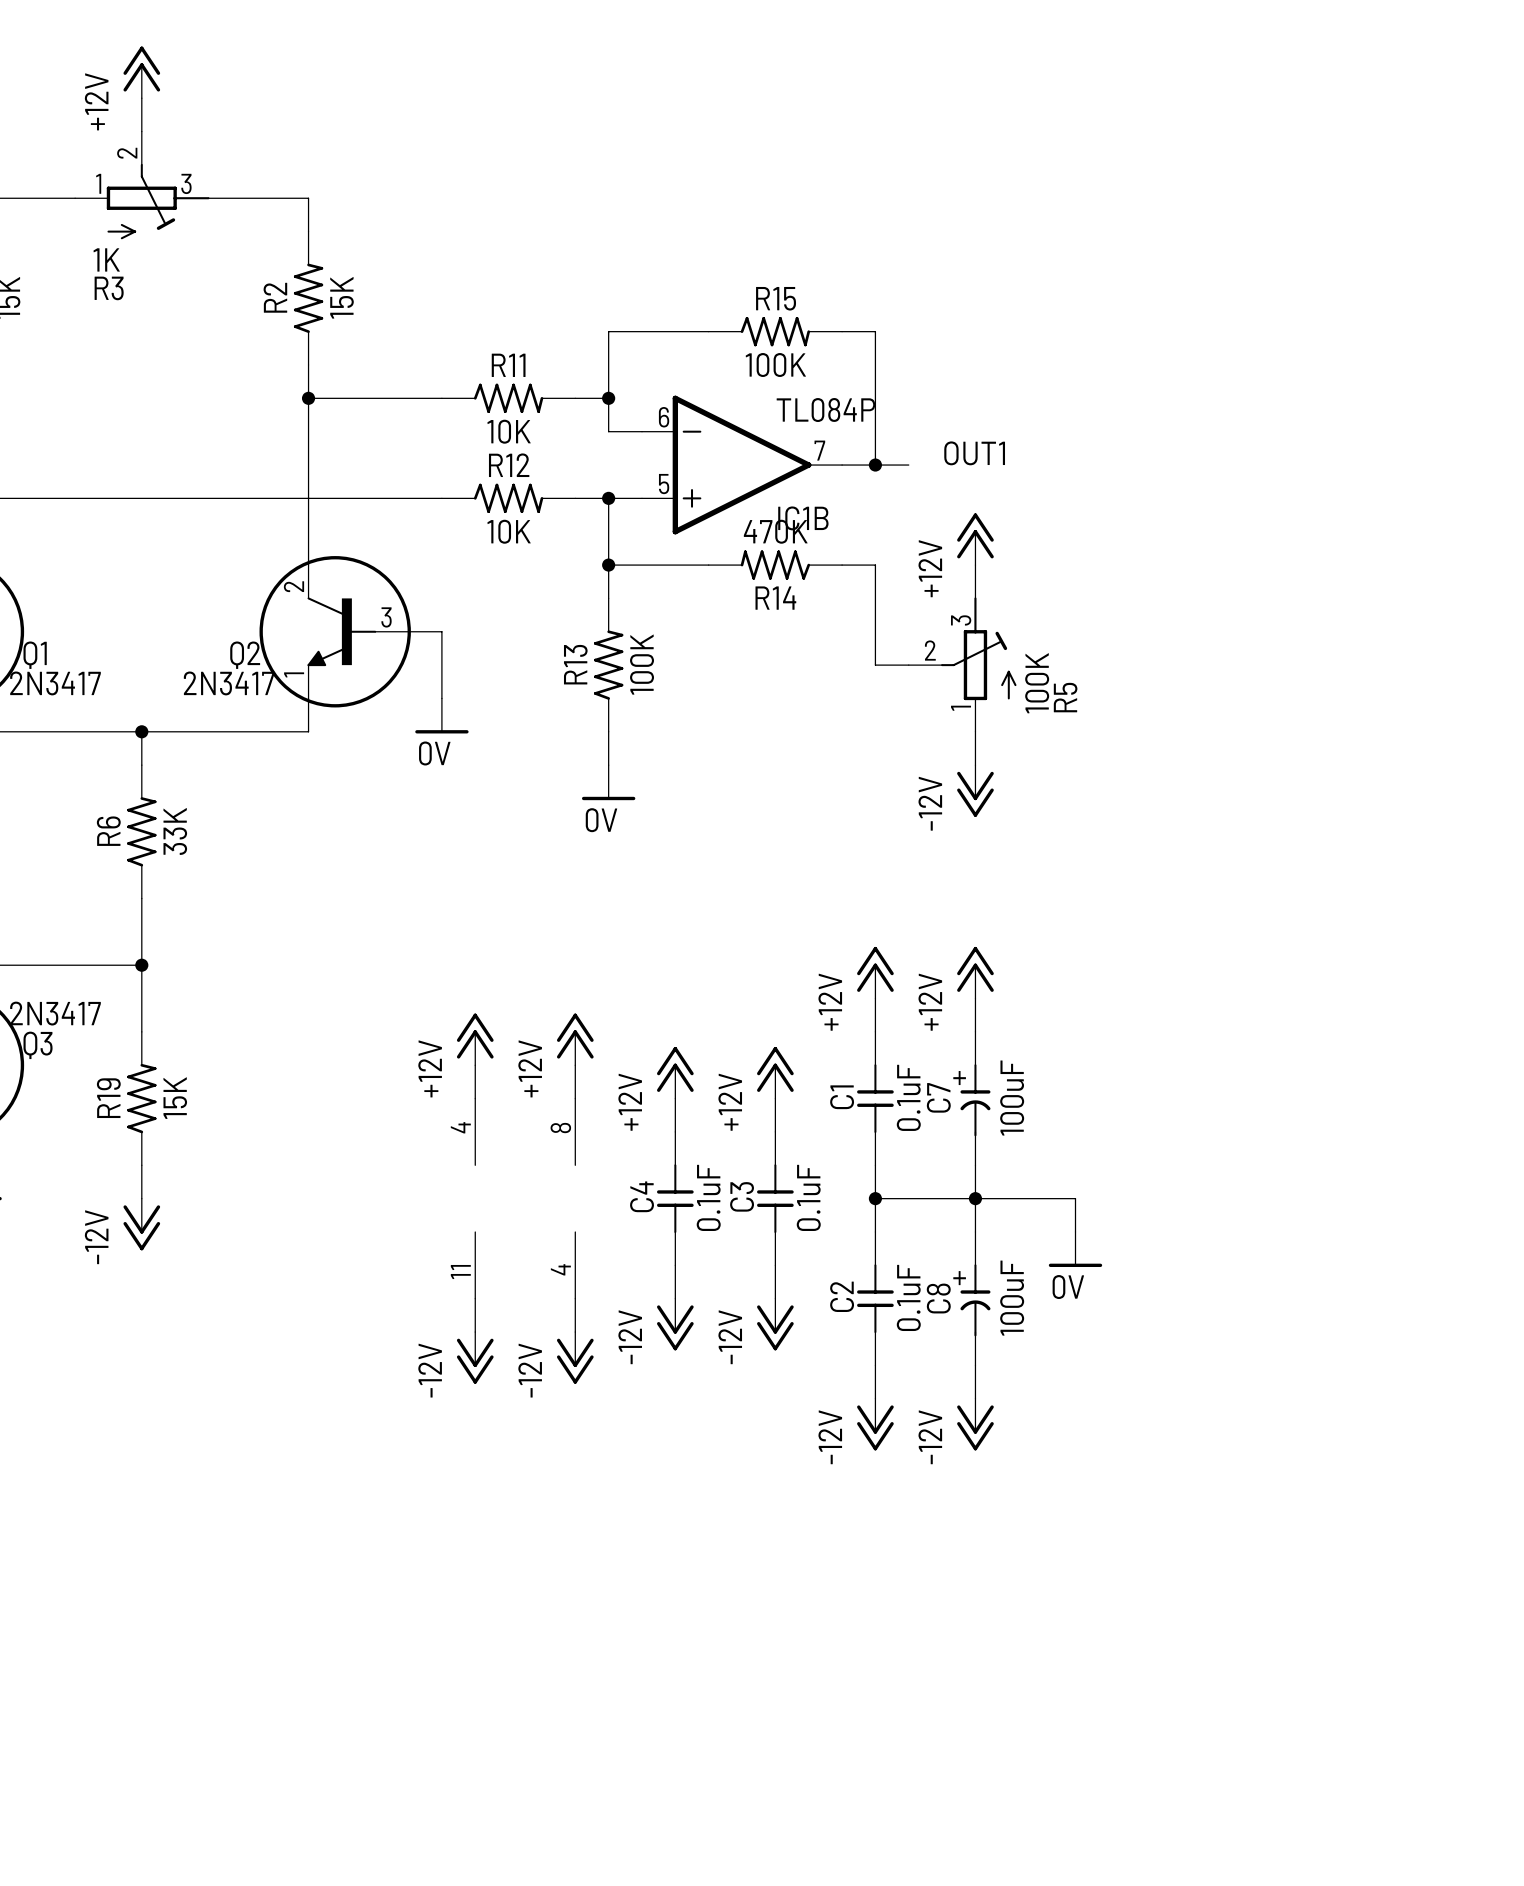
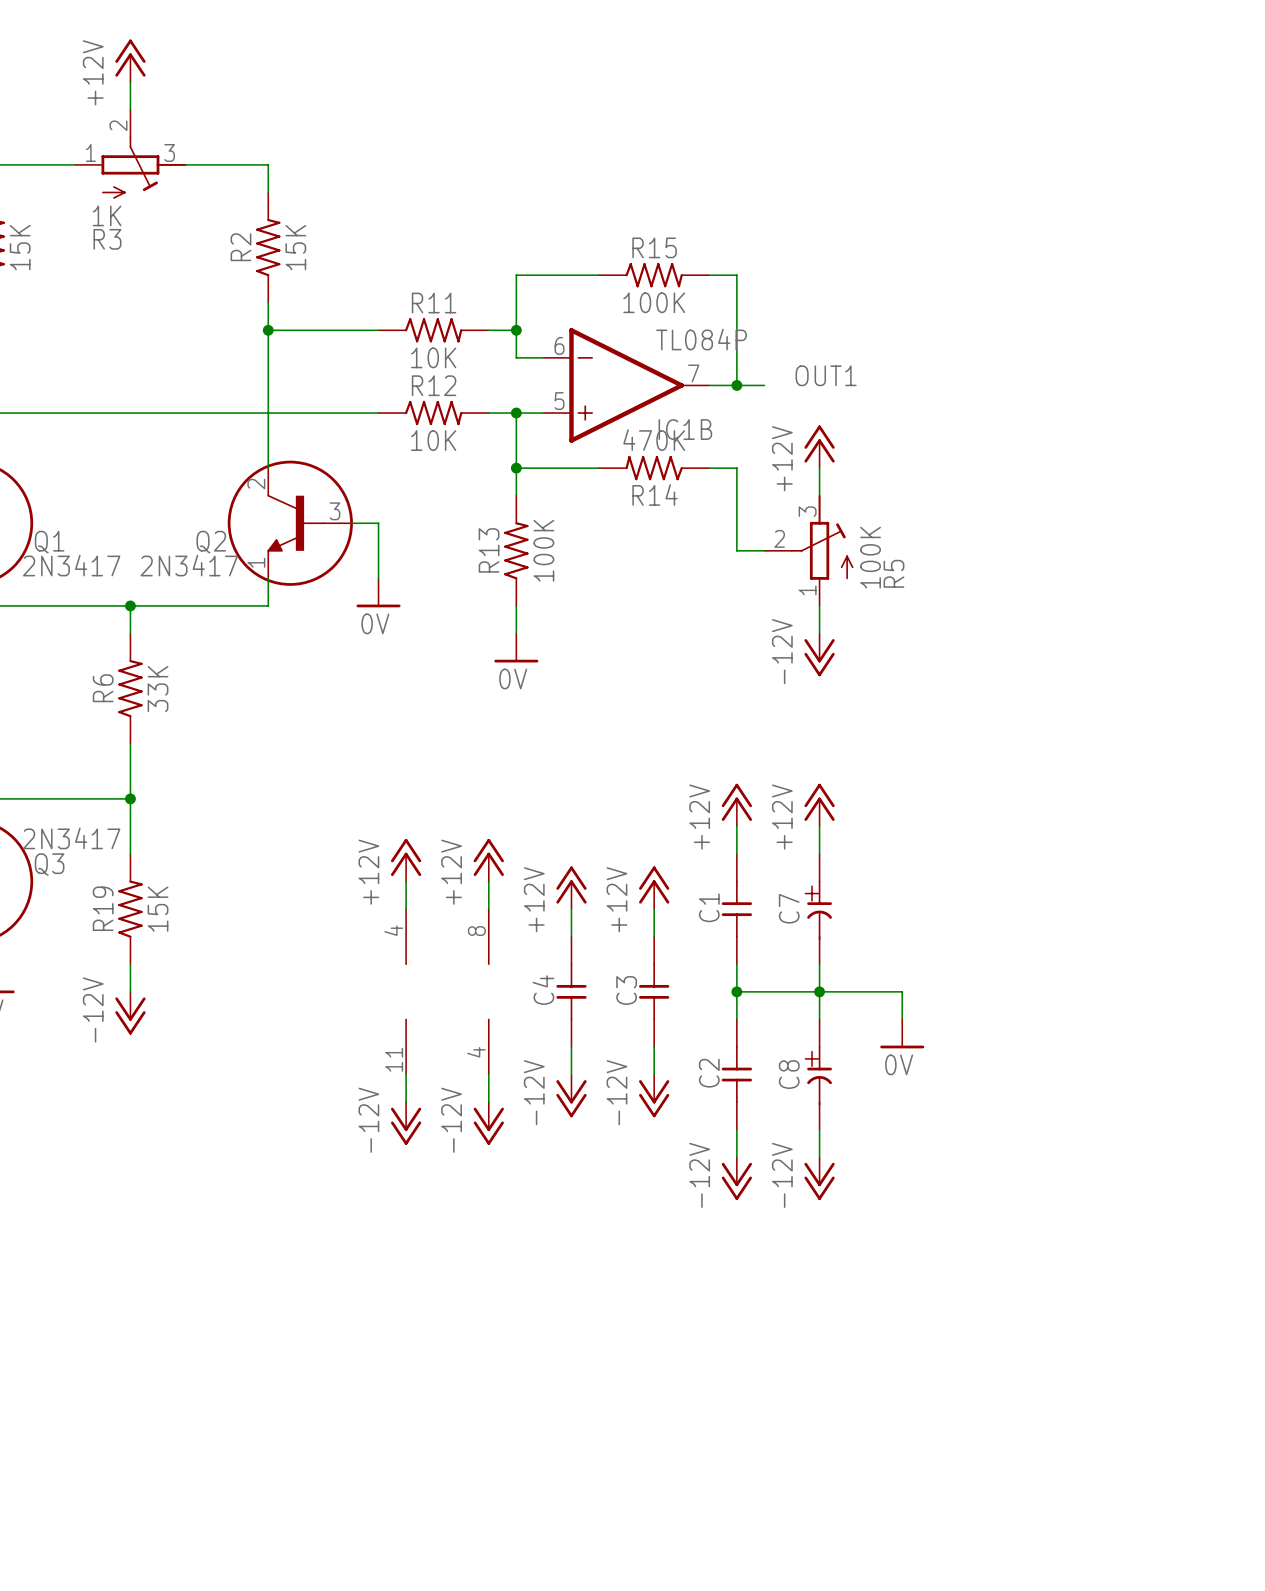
C1 value: 0.1uF (908, 1097) -> none
C7 value: 100uF (1012, 1098) -> none
C4 value: 0.1uF (708, 1197) -> none
C3 value: 0.1uF (808, 1197) -> none
C2 value: 0.1uF (908, 1297) -> none
C8 value: 100uF (1012, 1298) -> none

